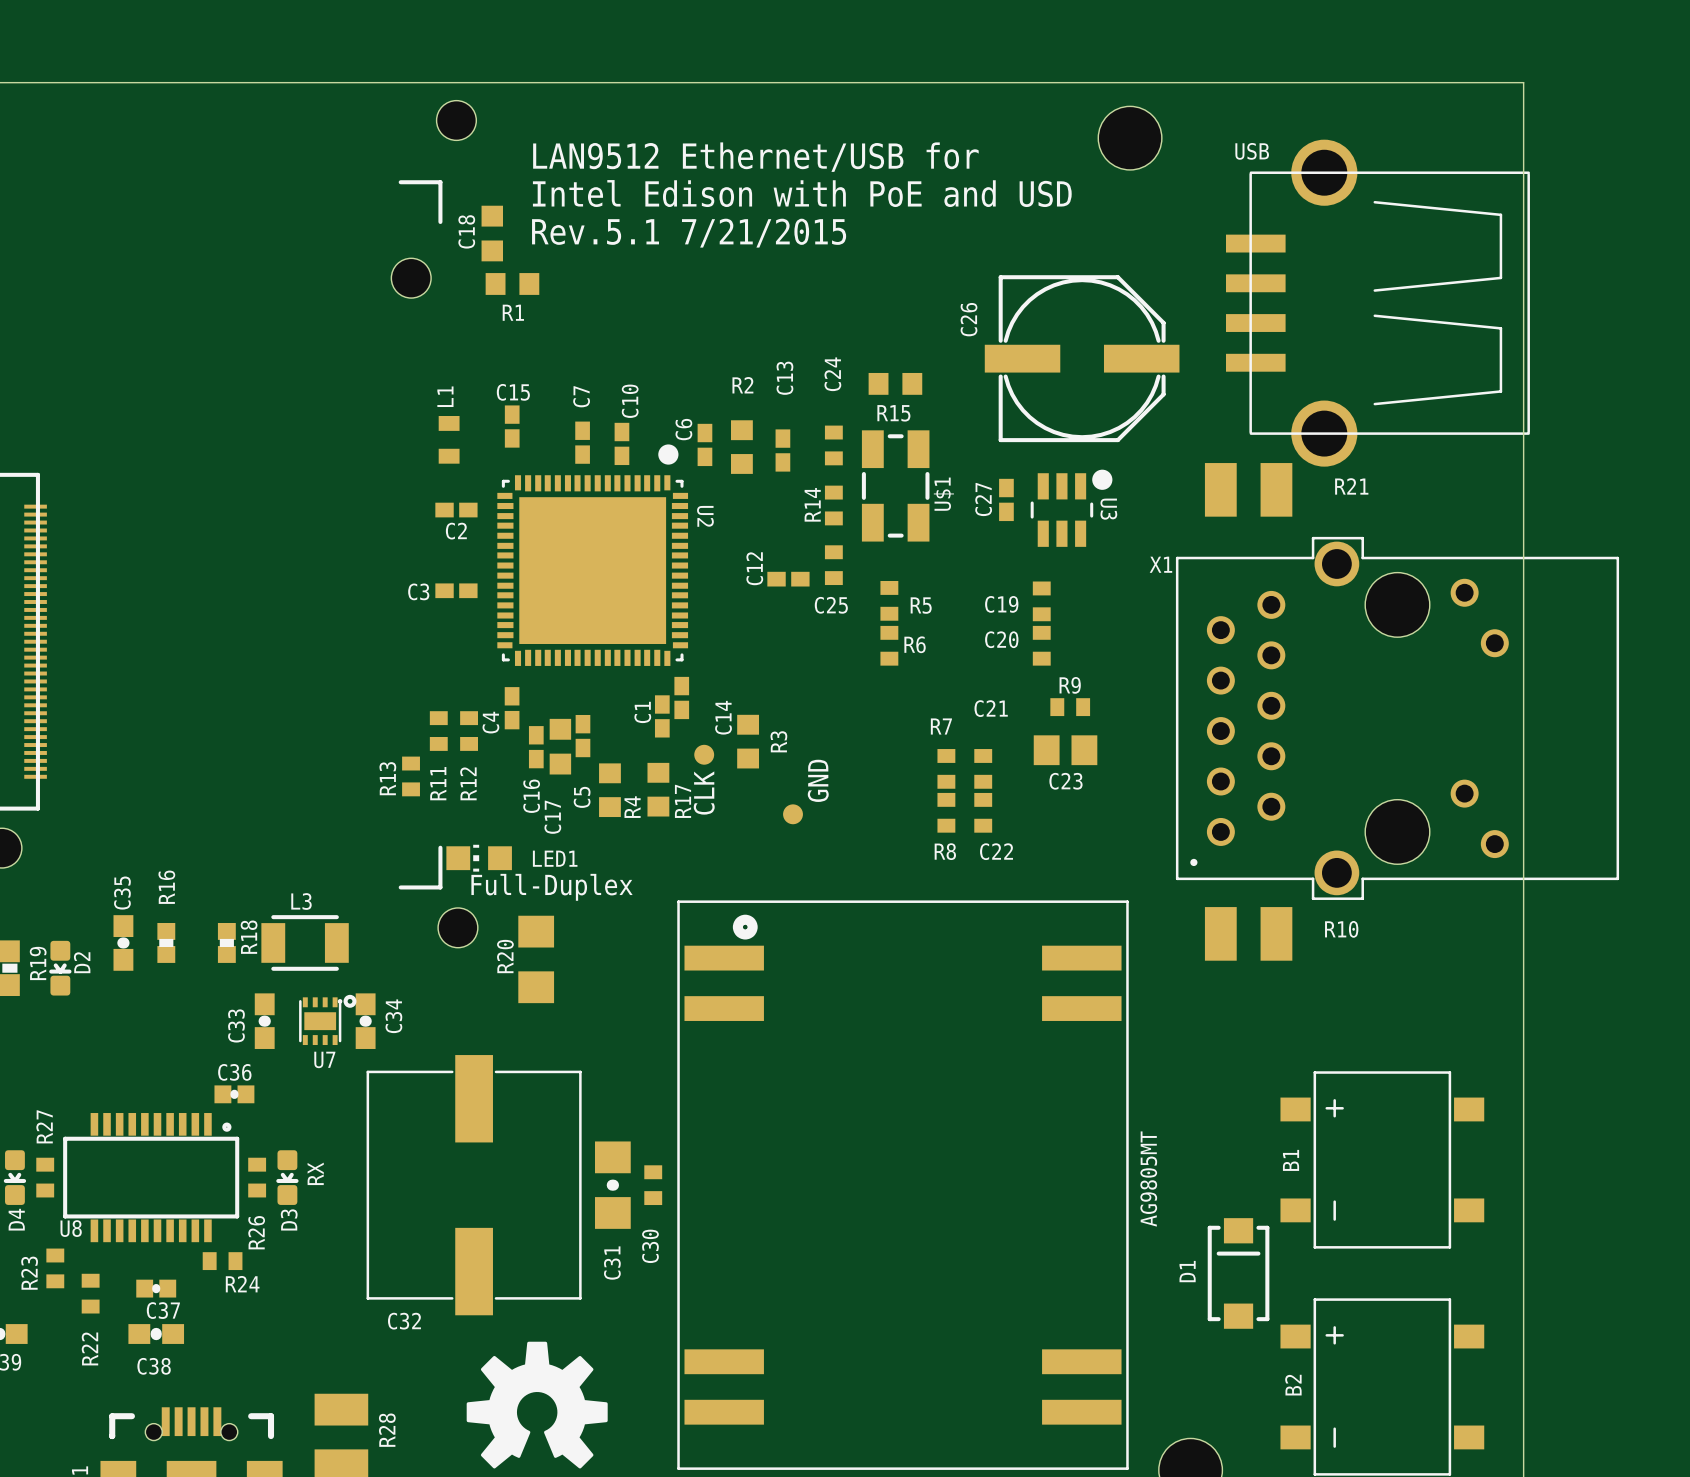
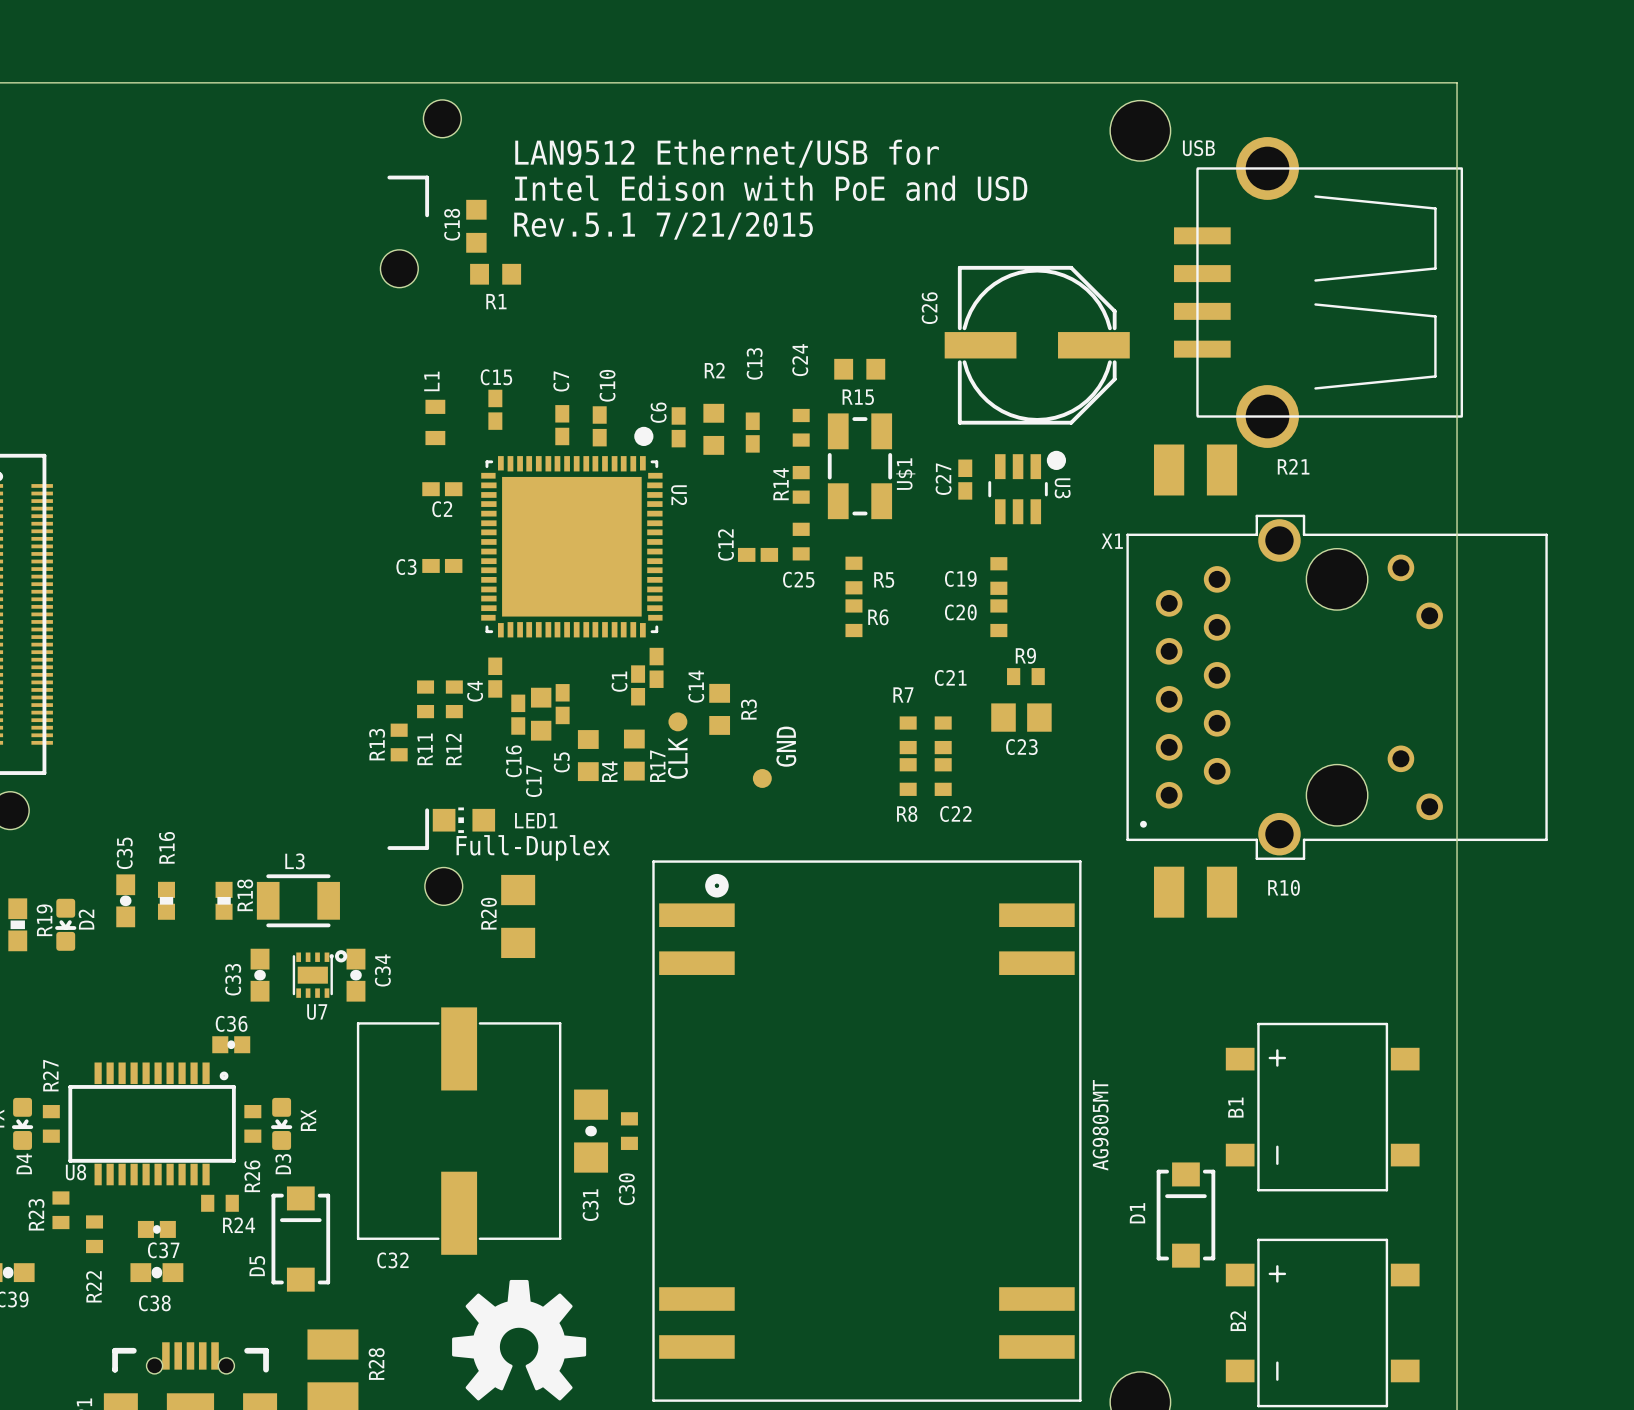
hole position: (1130, 138) -> (1140, 130)
D5: none -> (300, 1239)

